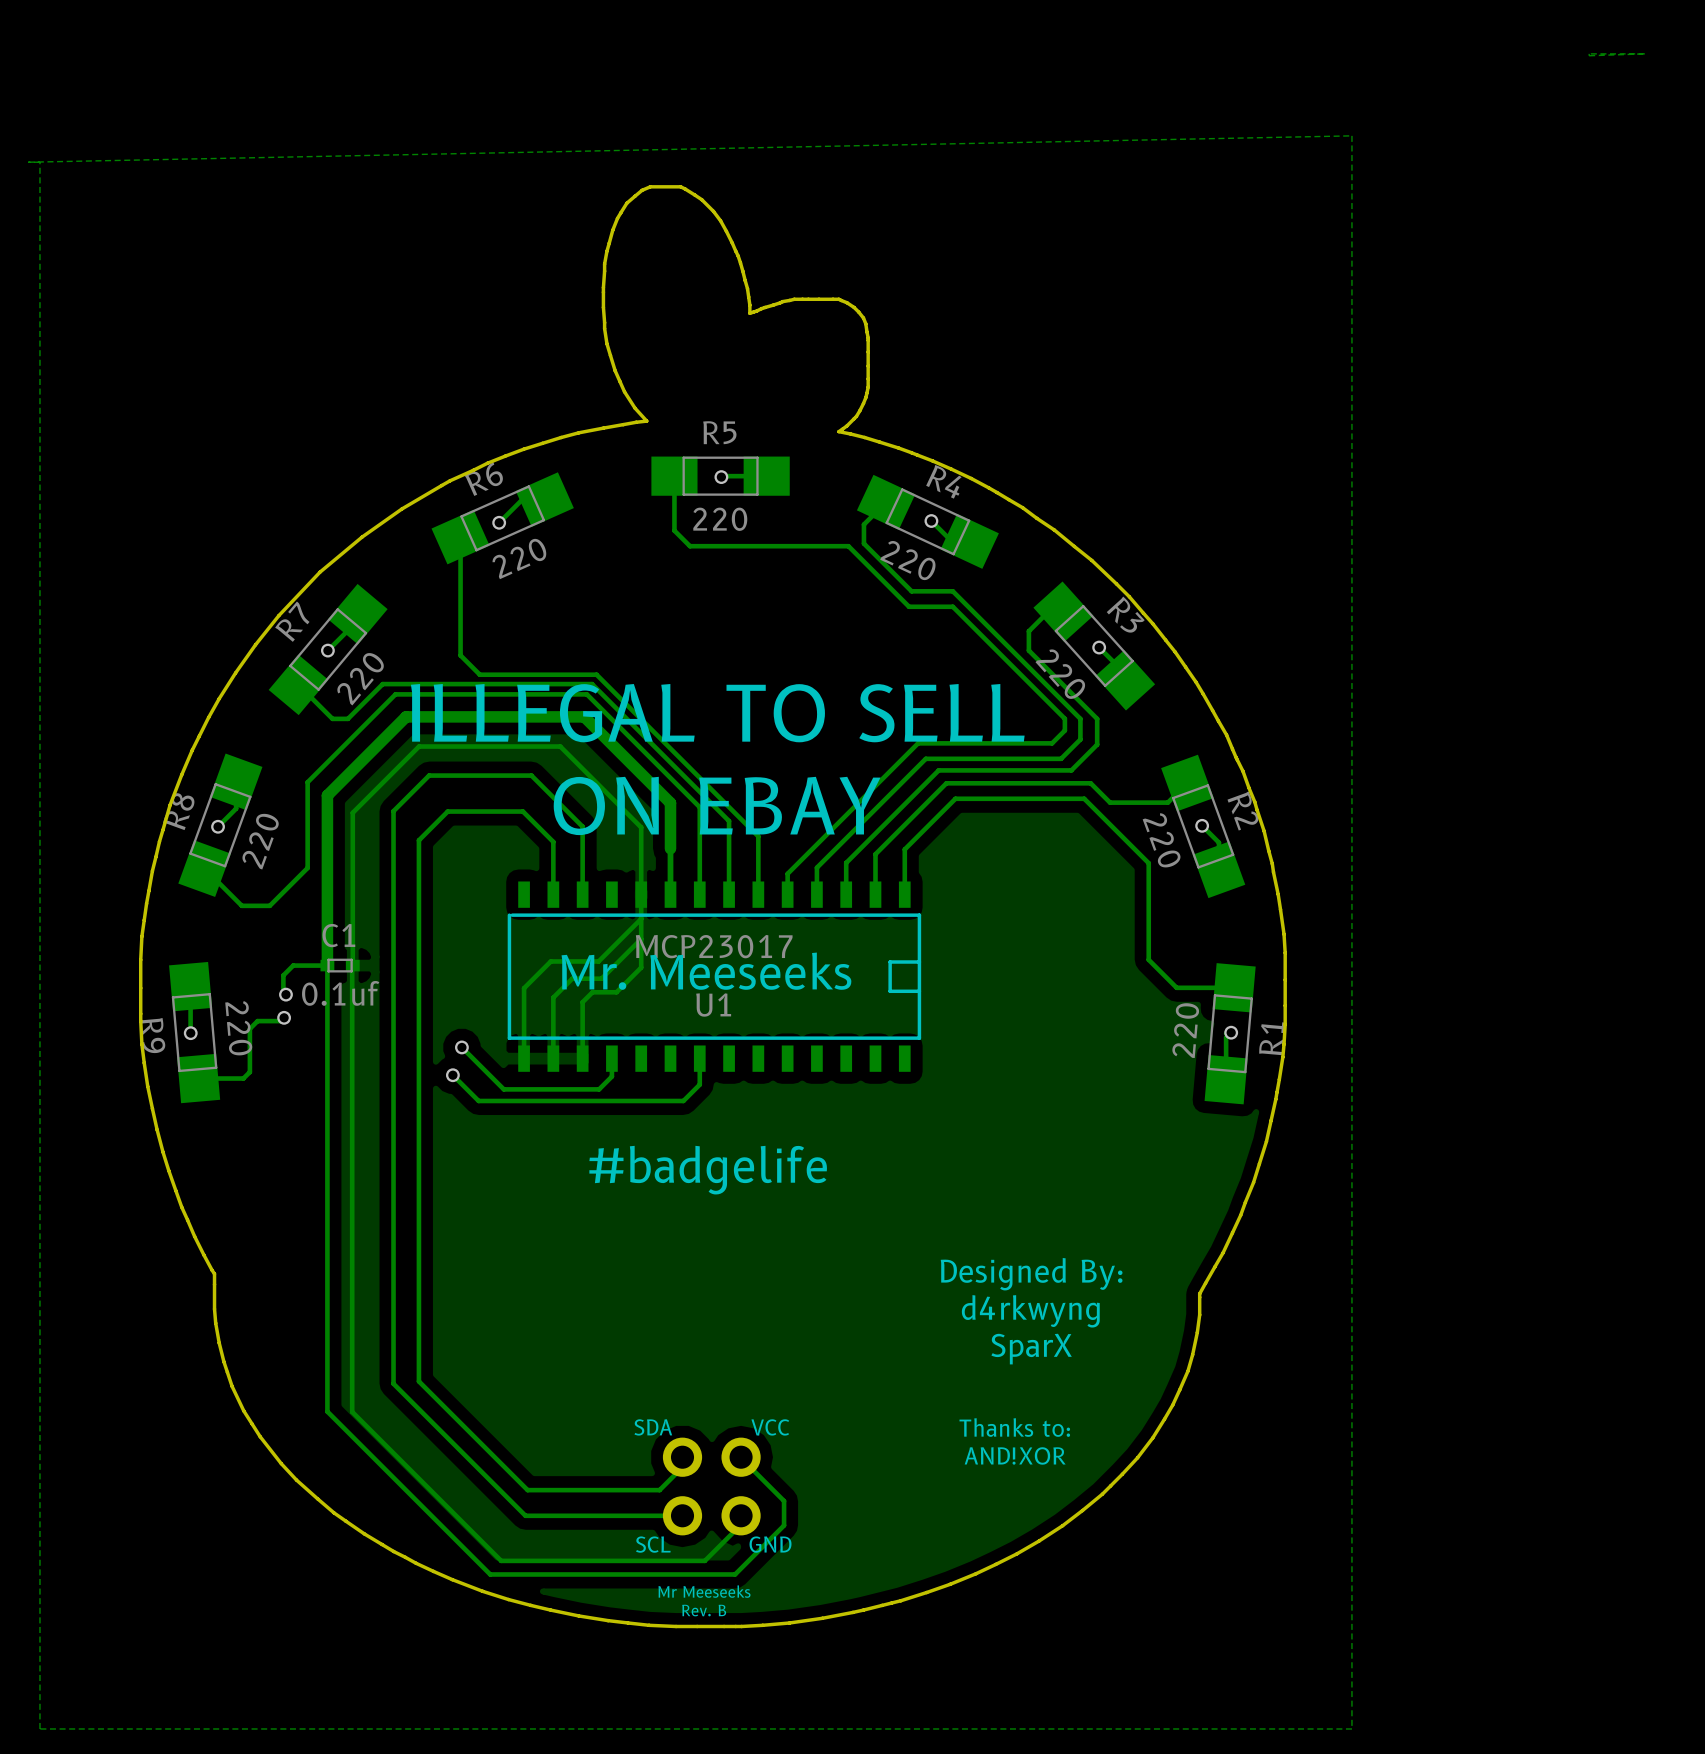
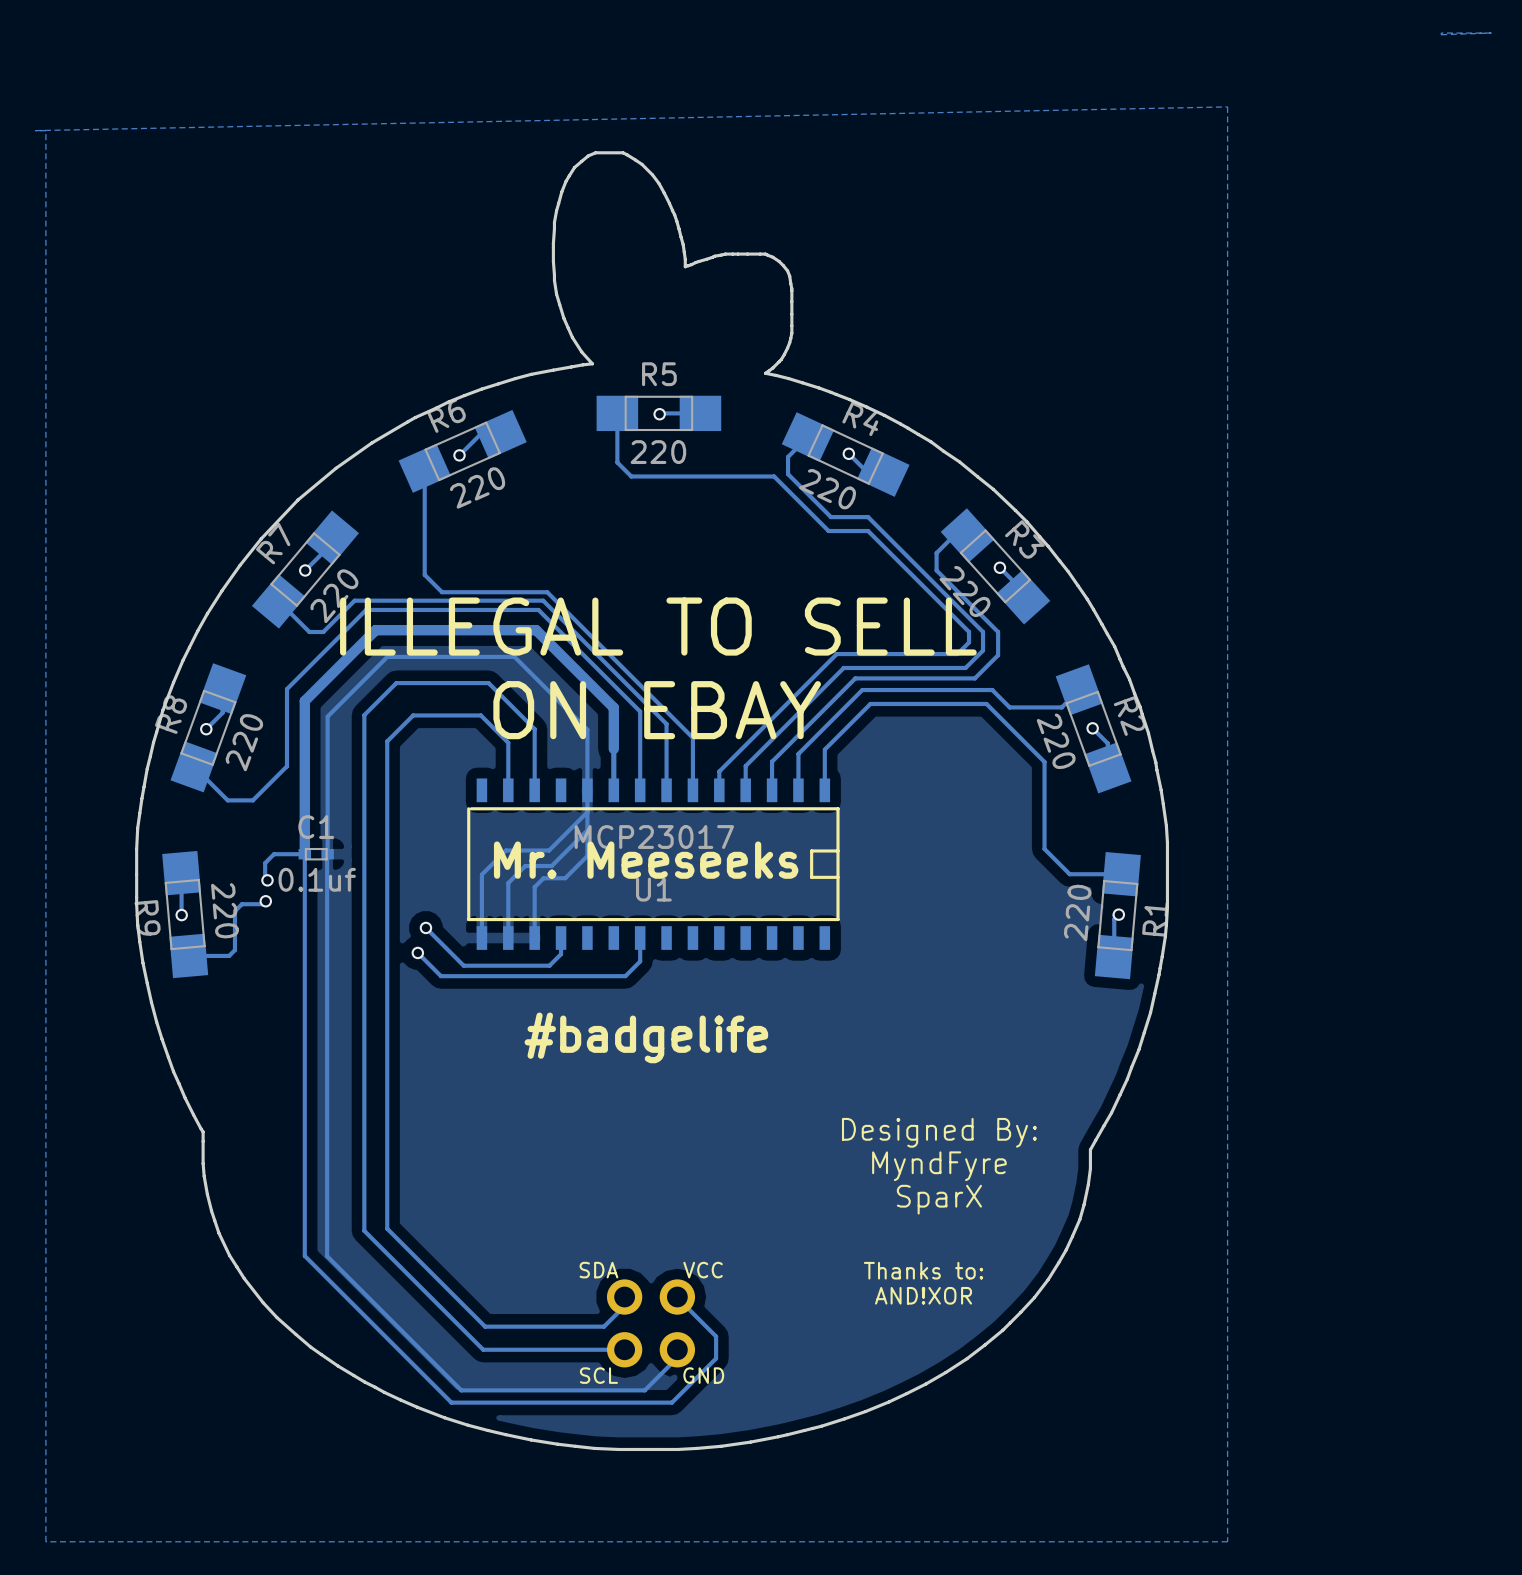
text: d4rkwyng (1030, 1311) -> MyndFyre (939, 1166)
text: Mr Meeseeks (704, 1591) -> none
text: Rev. B (704, 1610) -> none

